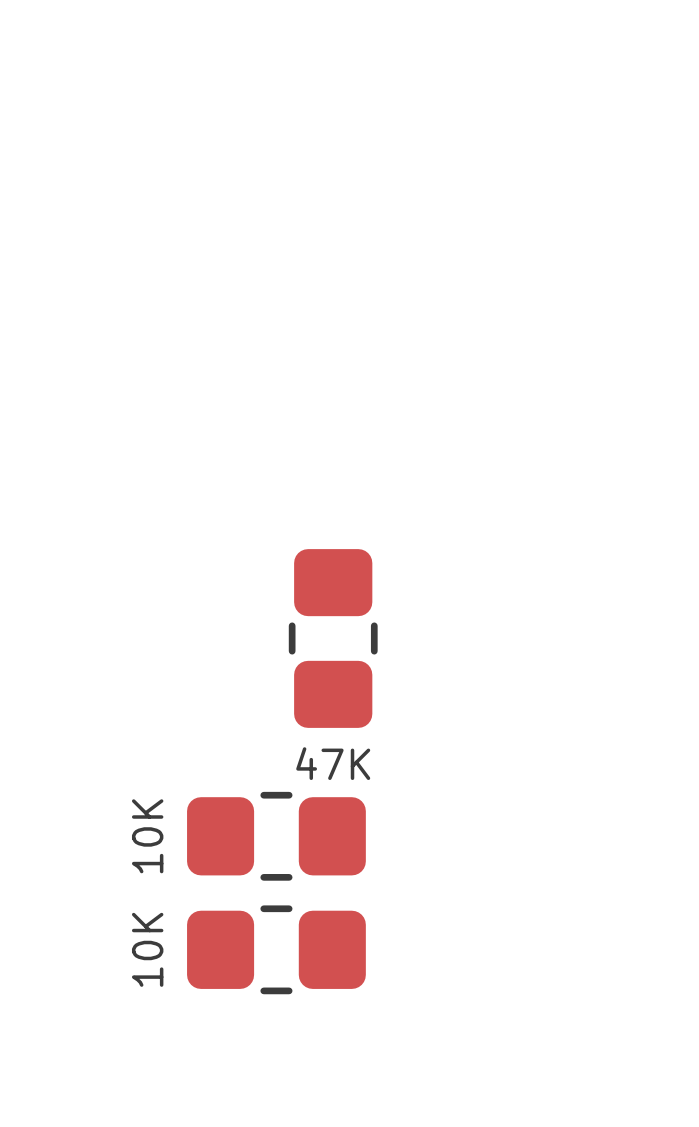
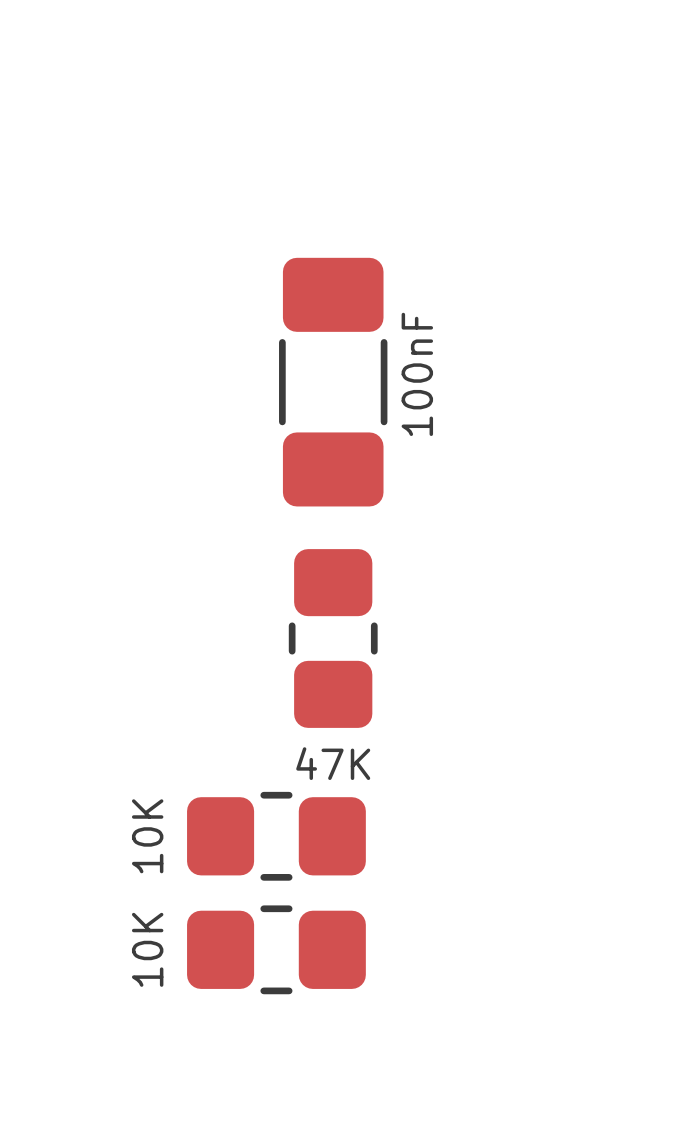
part: none -> 100nF (333, 382)

